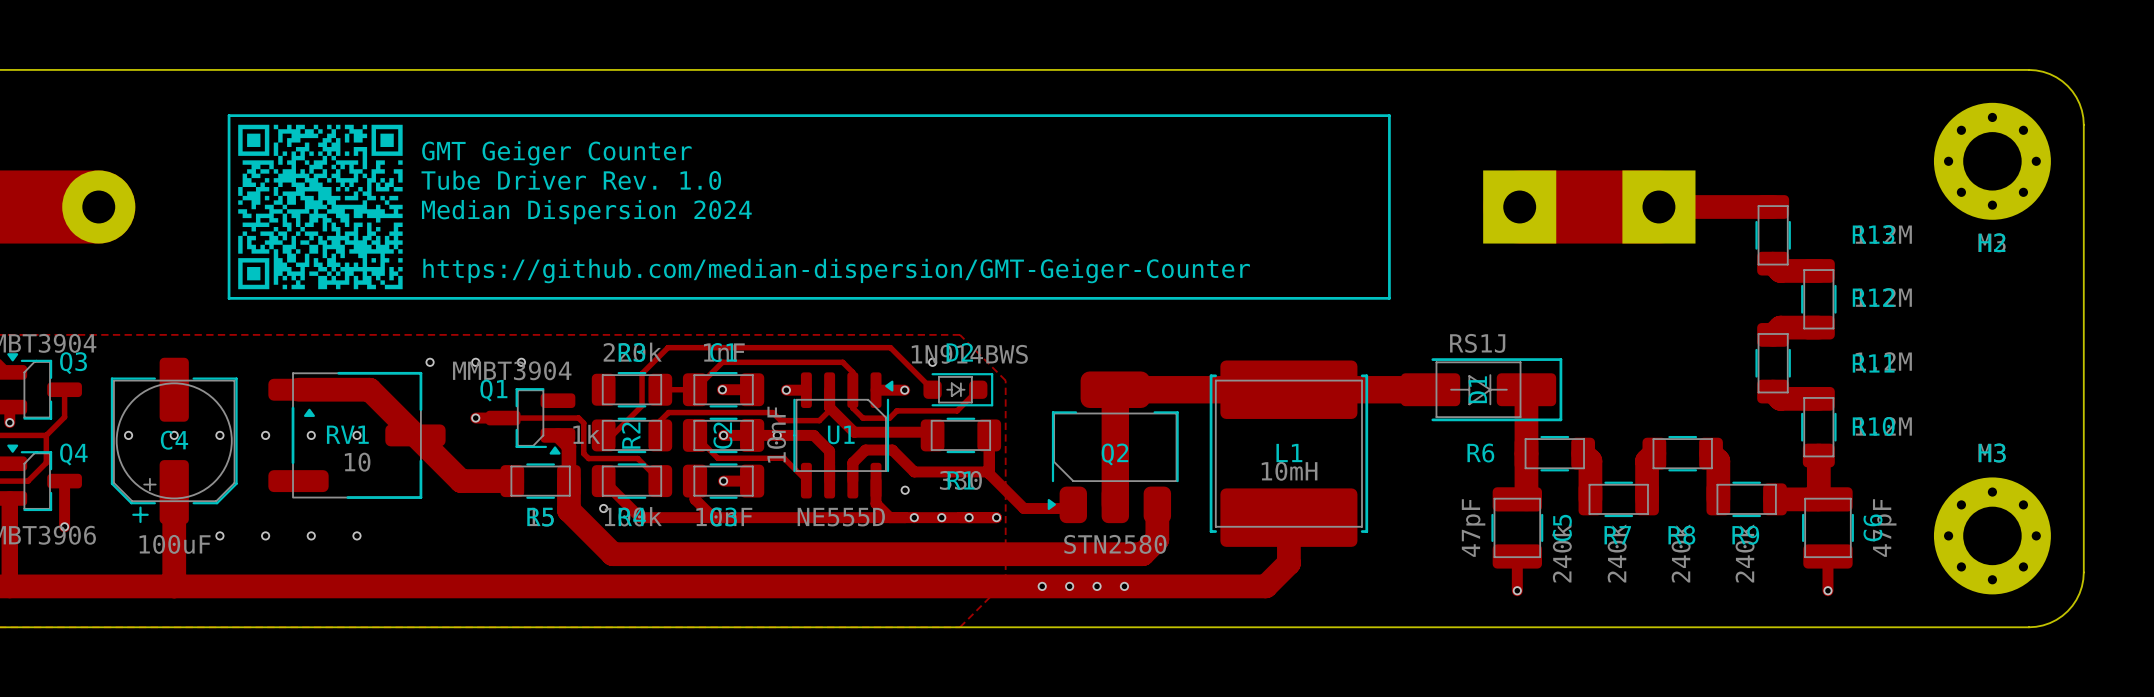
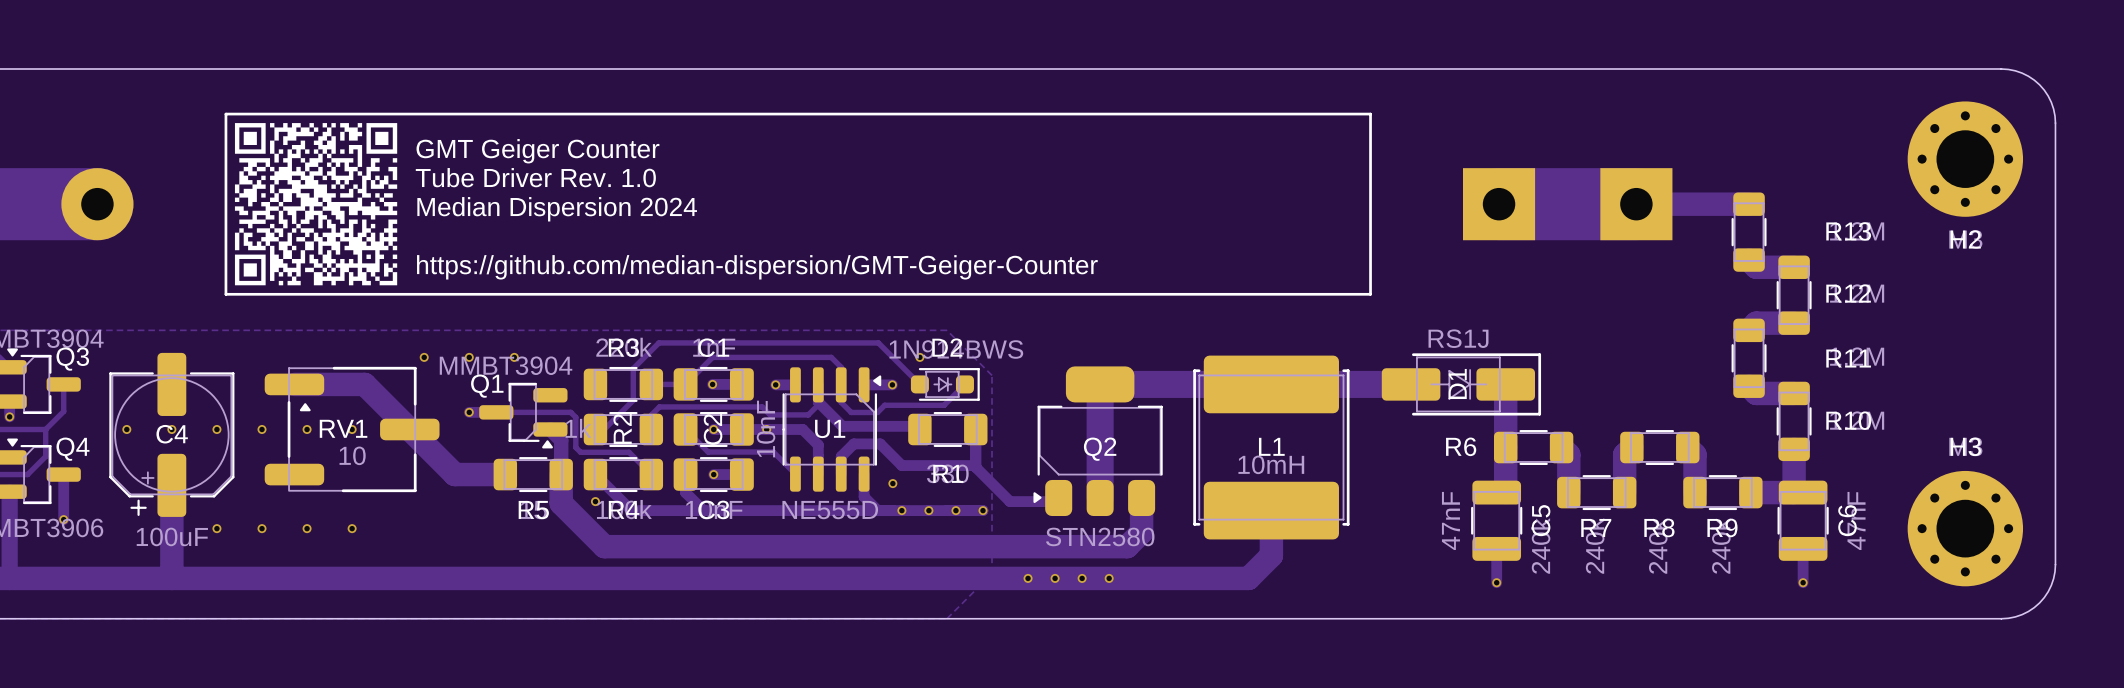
C5 value: 47pF (1473, 528) -> 47nF (1450, 520)
C6 value: 47pF (1884, 528) -> 47nF (1856, 520)

